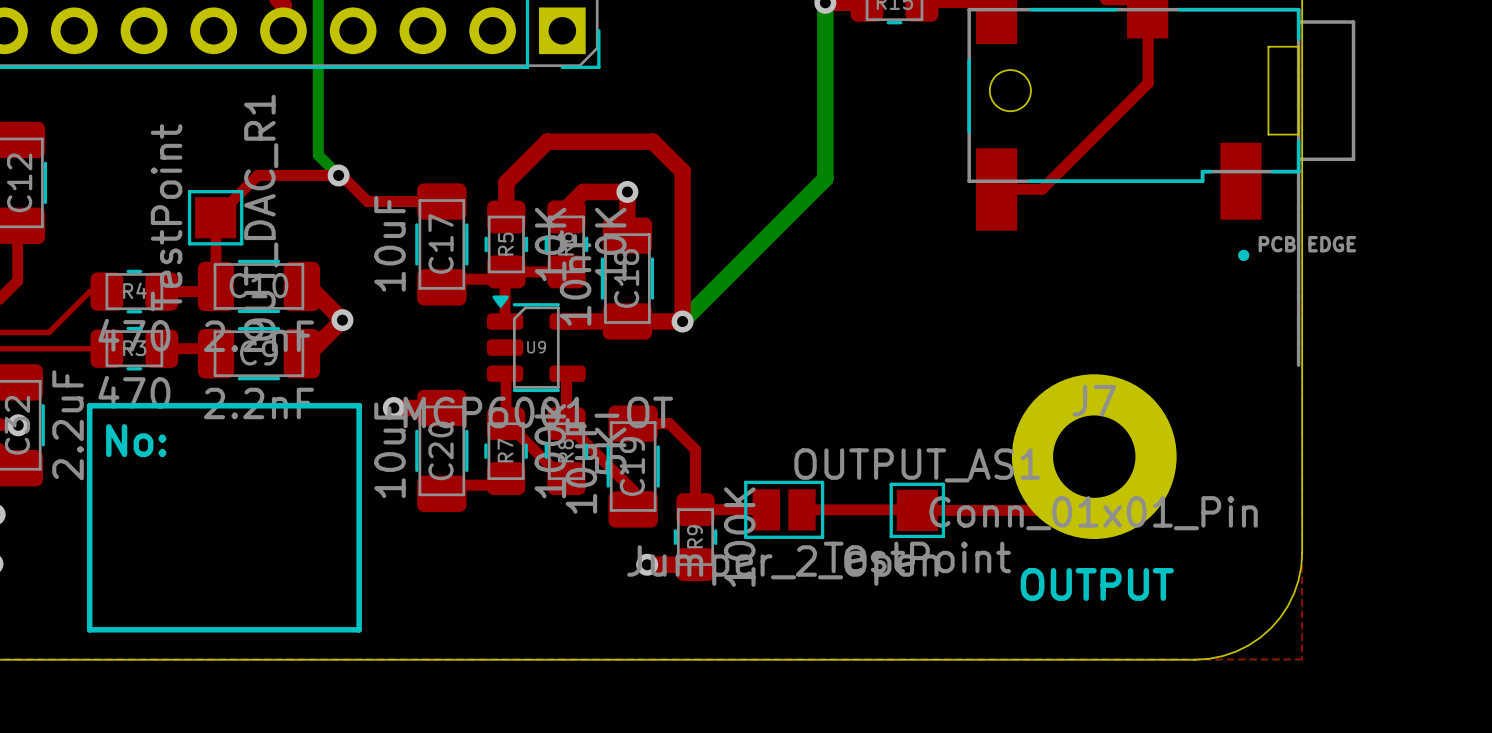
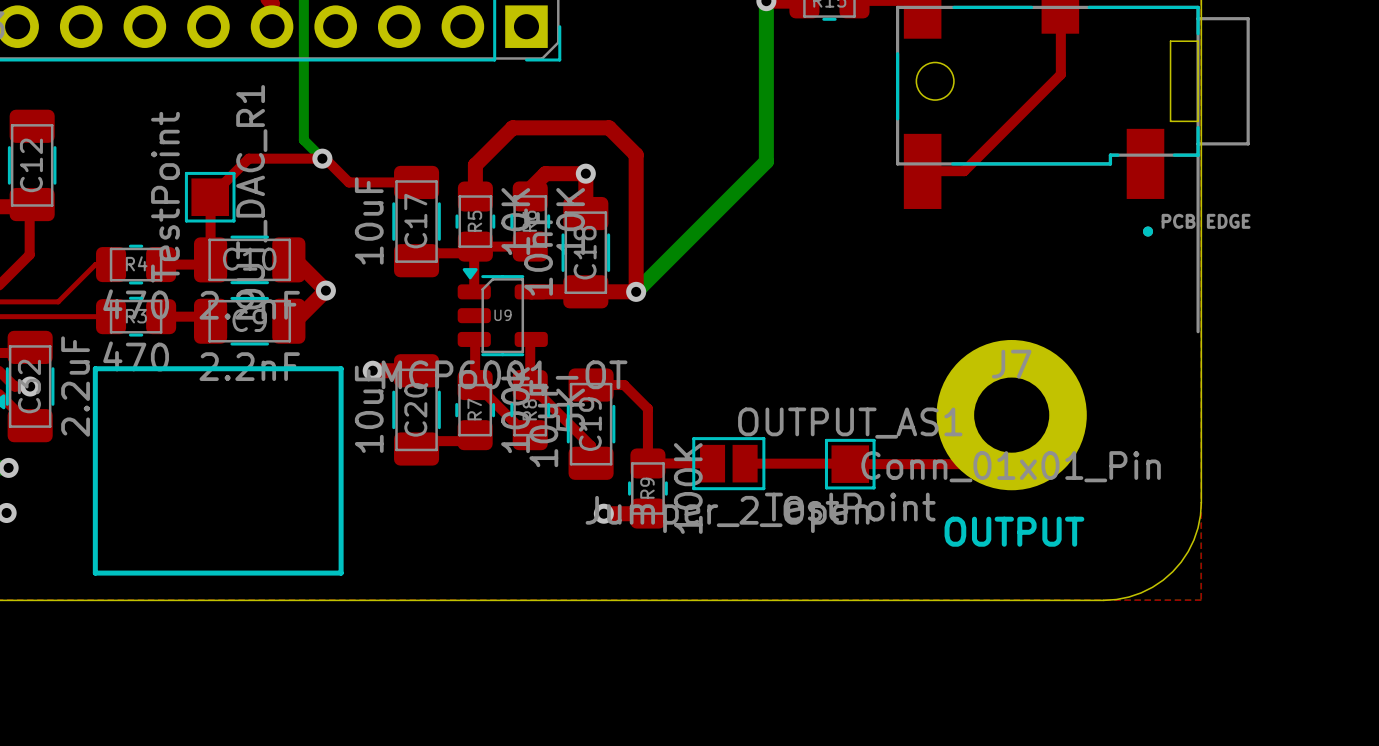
text: No: (136, 440) -> none

